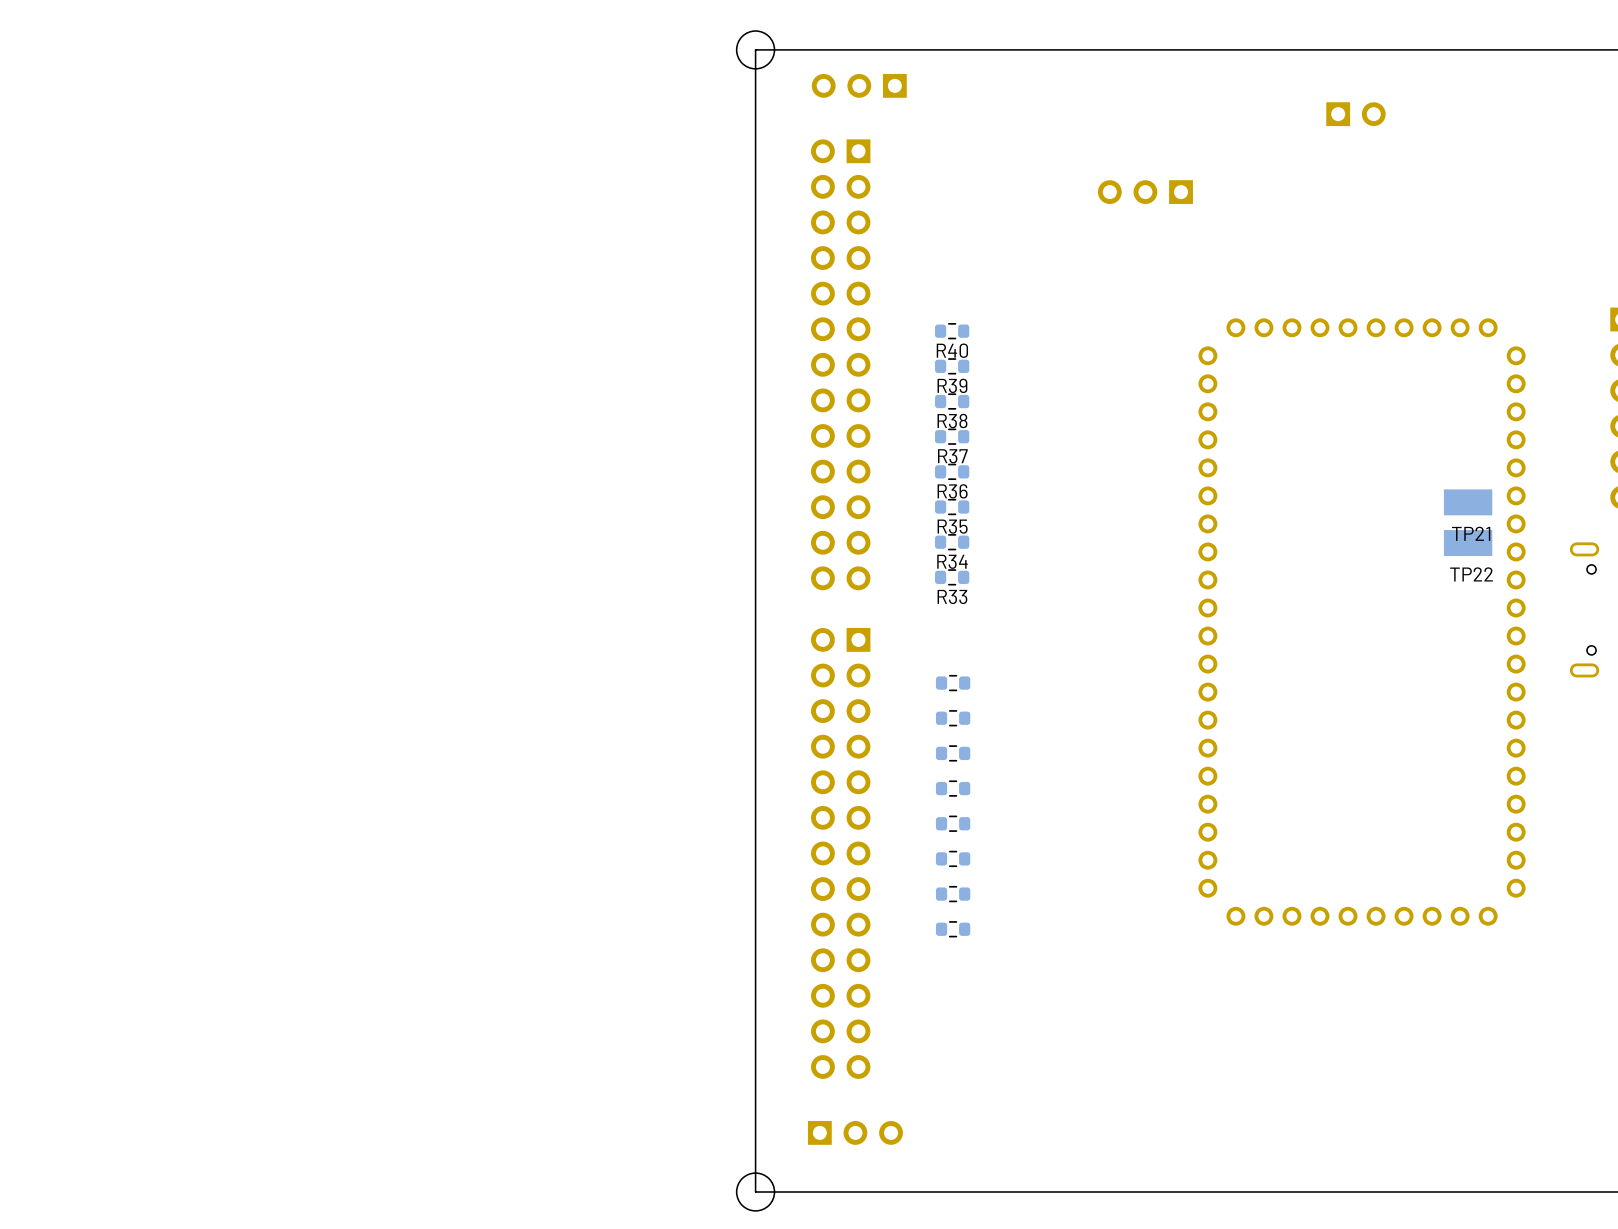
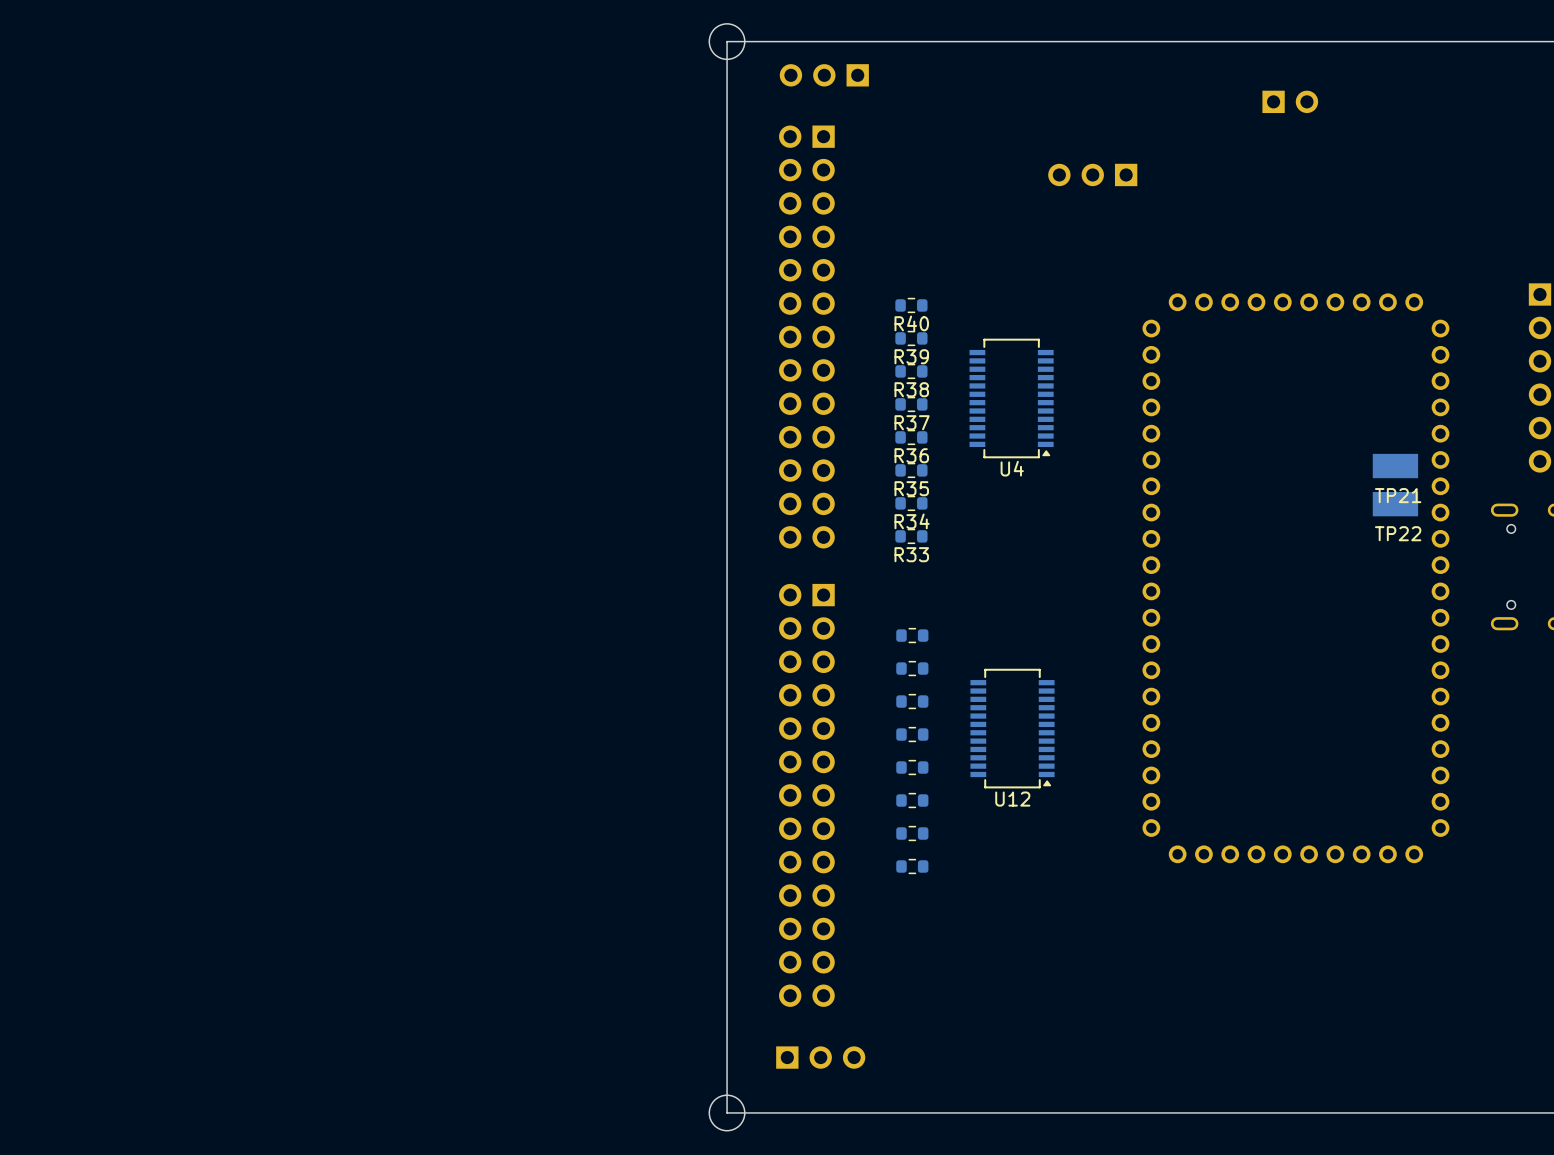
U4: none -> (1011, 398)
U12: none -> (1012, 728)

